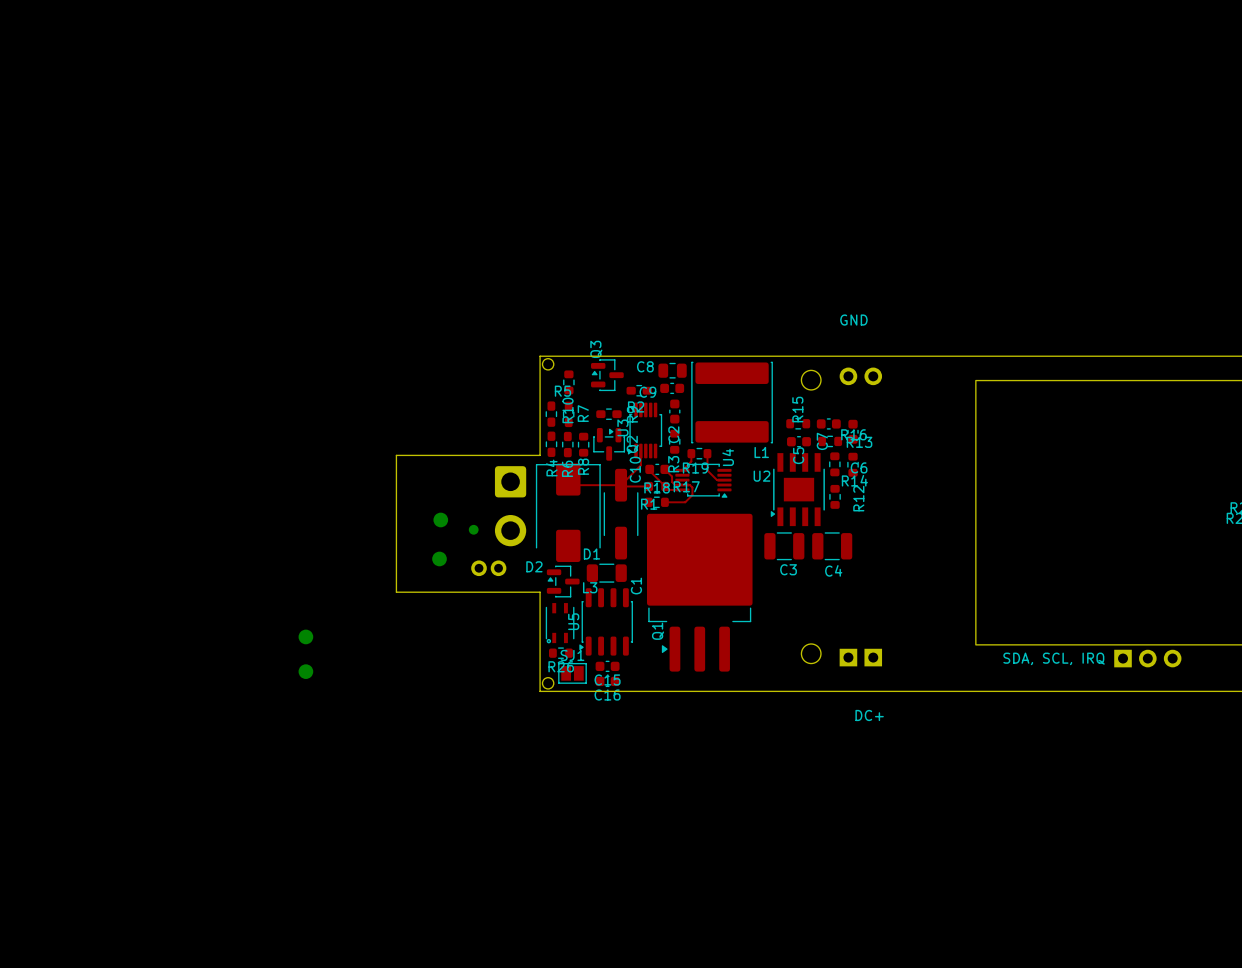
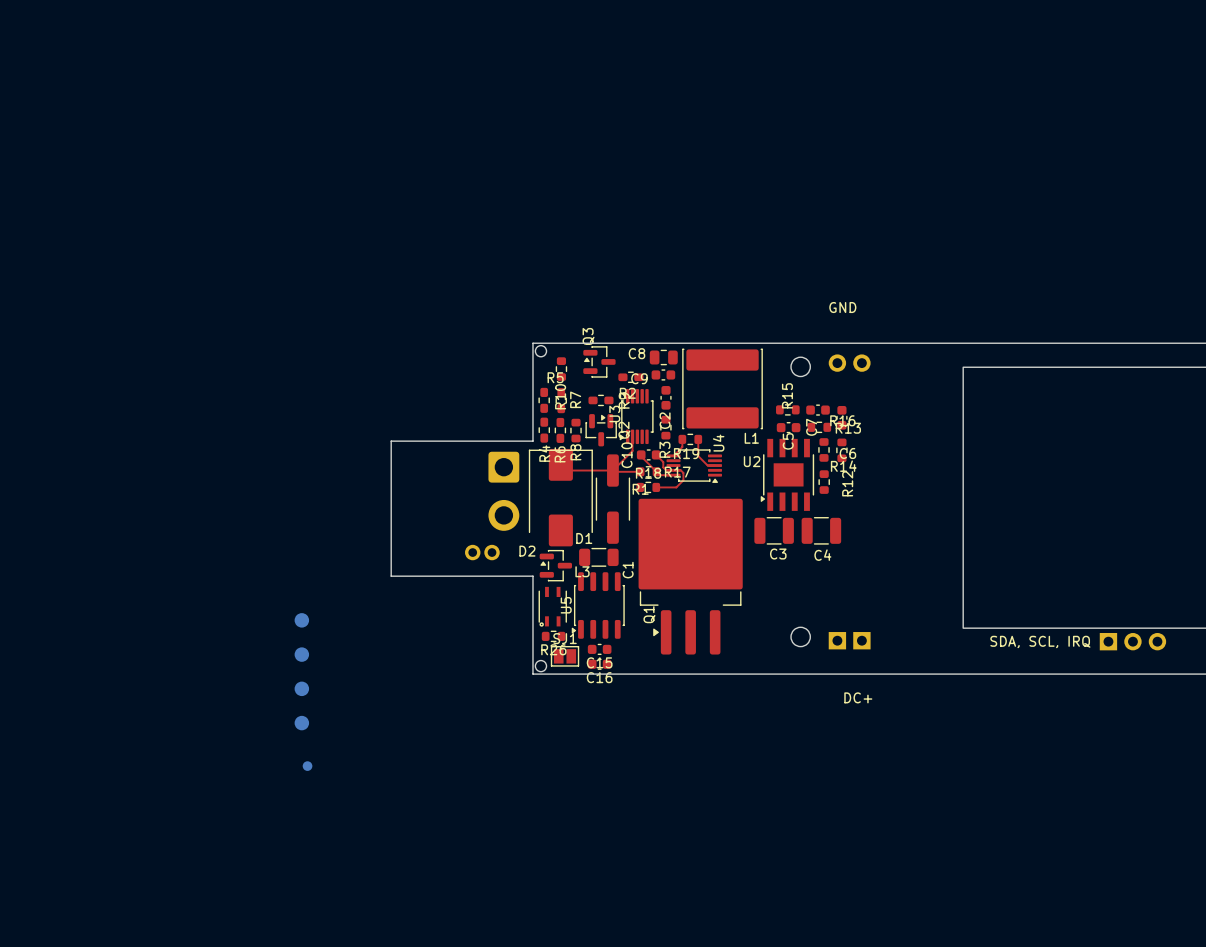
part: (440, 519) -> none
part: (473, 529) -> none
part: (439, 558) -> none
part: none -> (301, 688)
part: none -> (301, 723)
part: none -> (307, 766)

